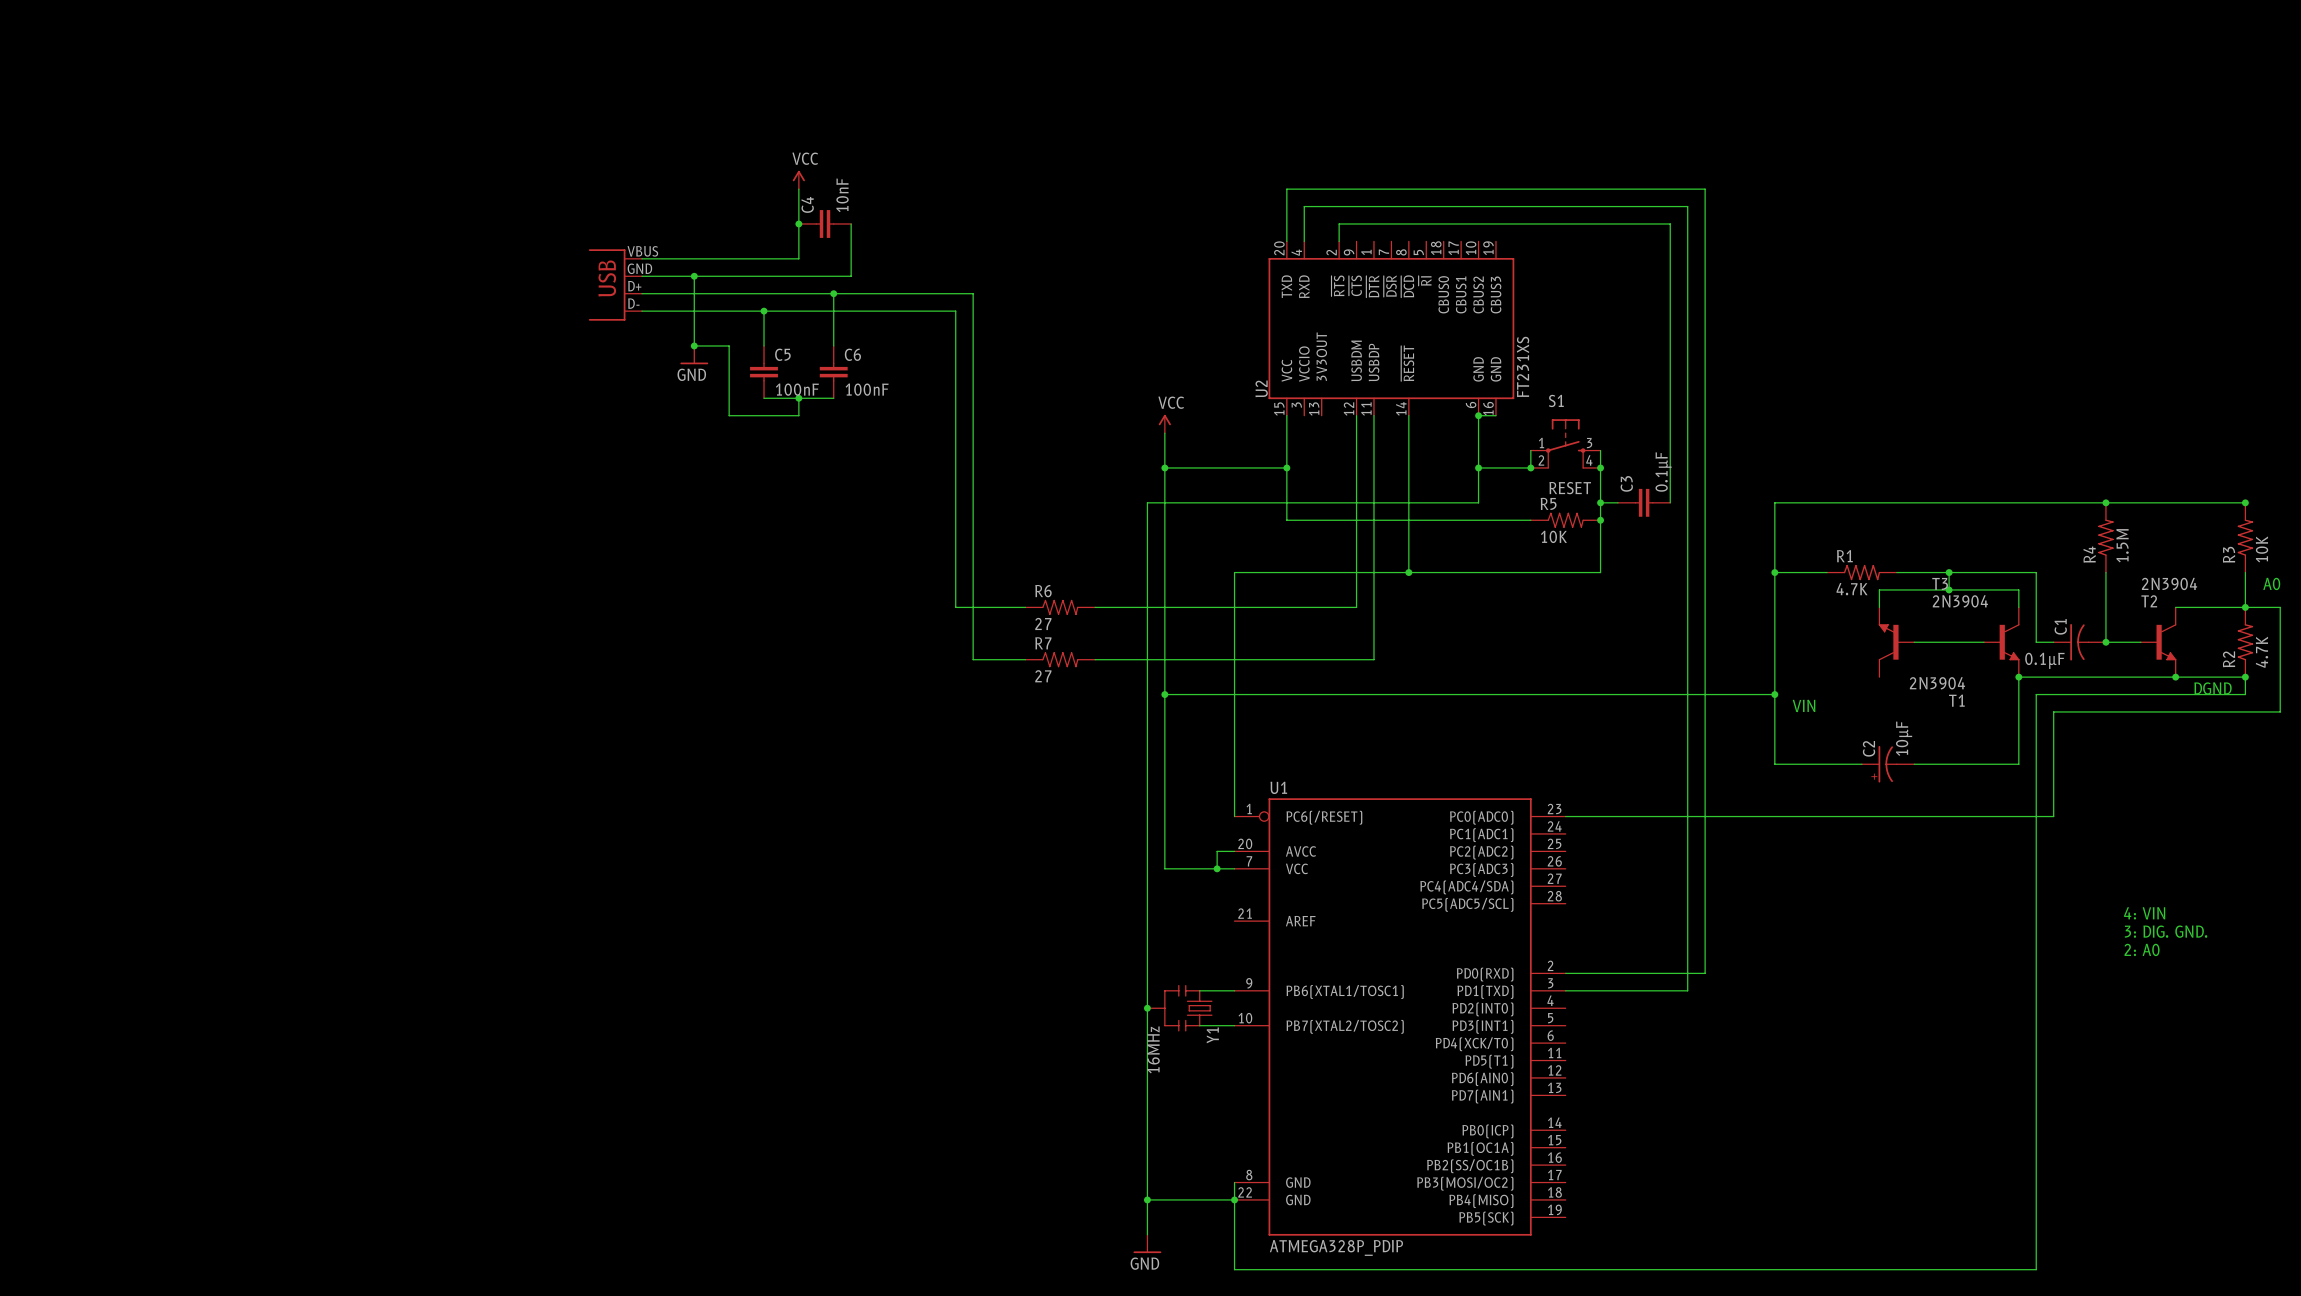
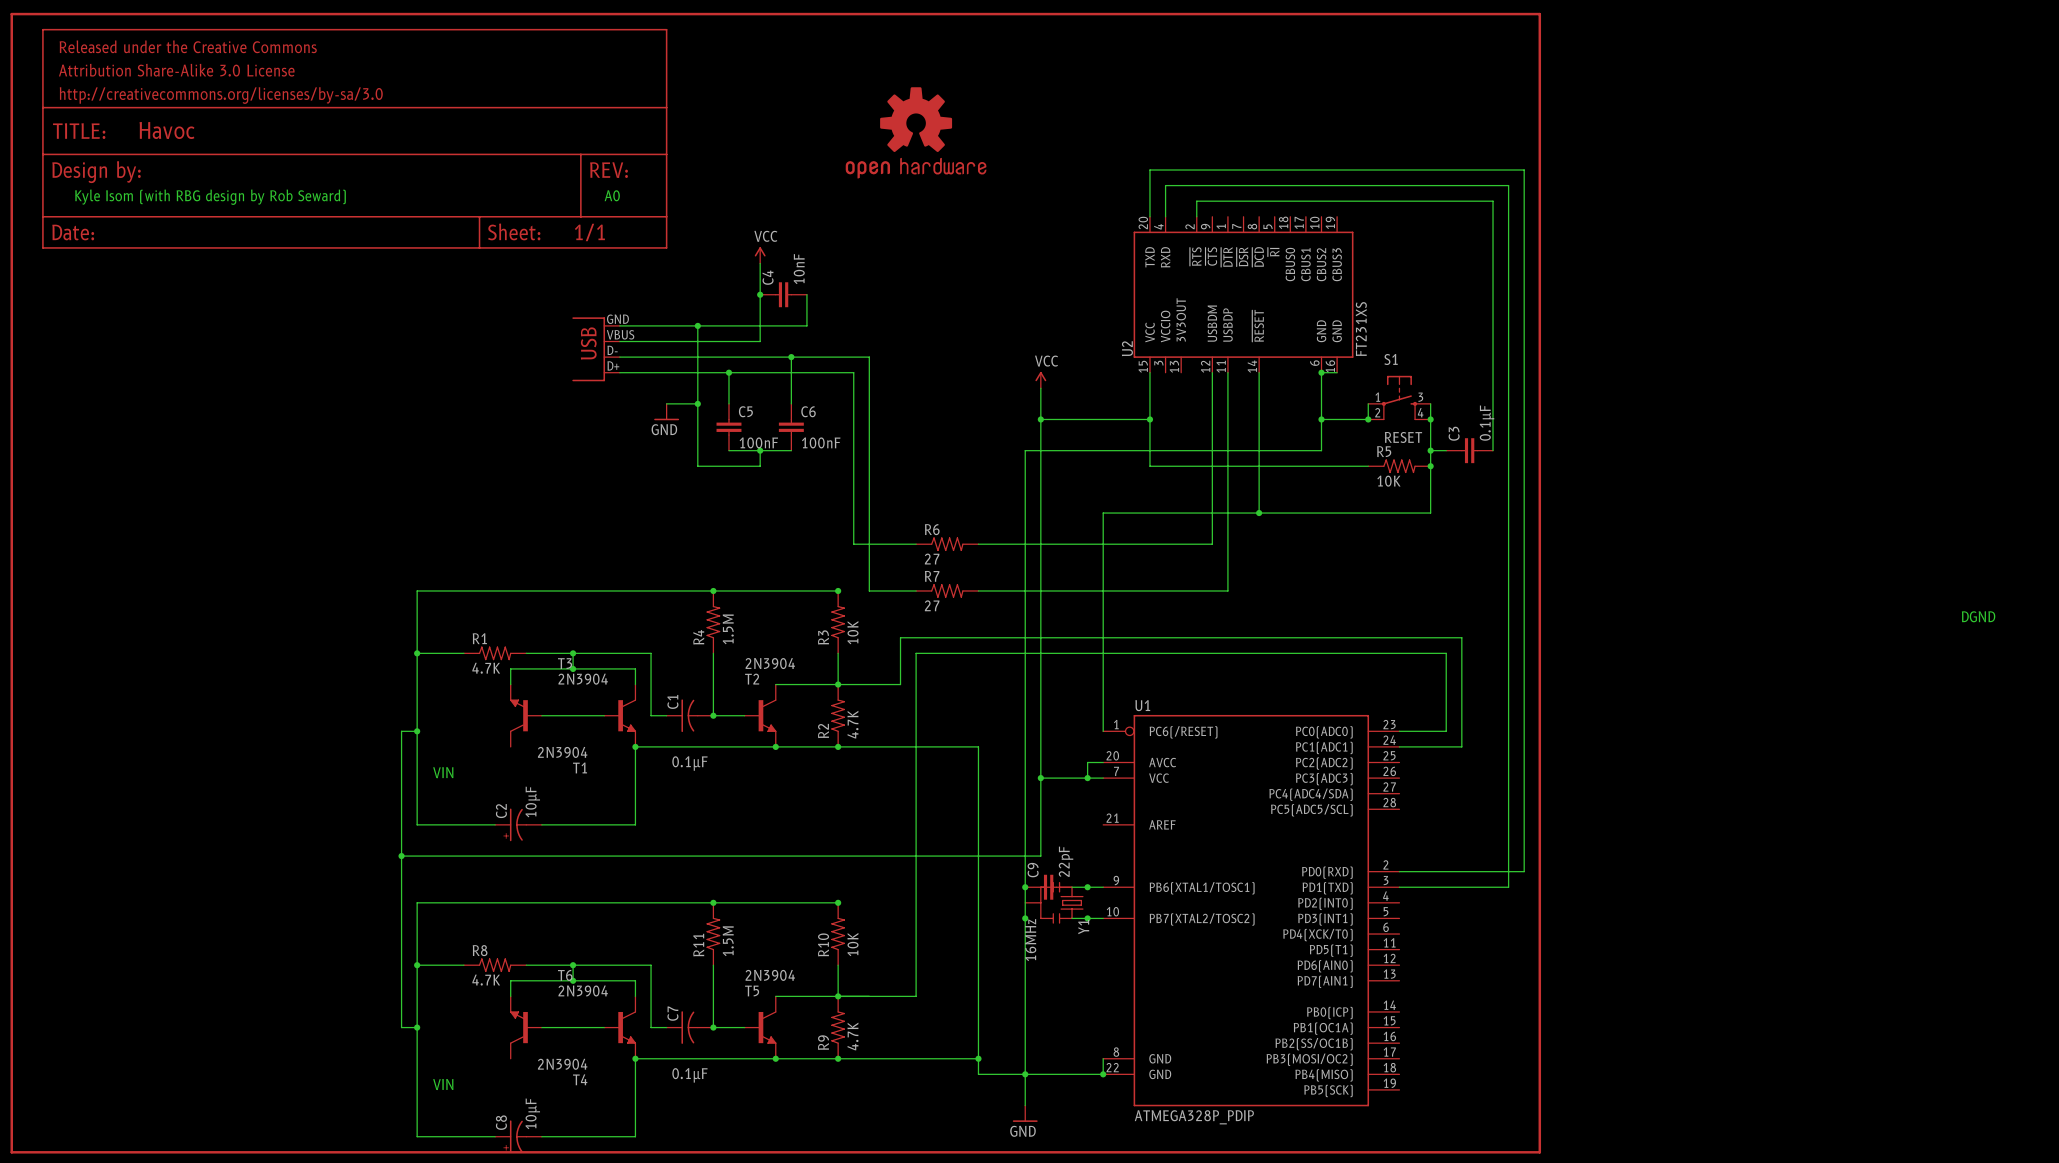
part: none -> (916, 132)
part: none -> (354, 138)
power symbol position: VCC (798, 179) -> VCC (760, 255)
wire: (798, 189) (798, 258) (642, 258) -> none
text: none -> A0 (612, 195)
text: none -> Kyle Isom (with RBG design by Rob Seward) (210, 197)
junction: (798, 223) -> none
C4 position: (825, 223) -> (783, 294)
wire: (851, 223) (851, 276) (642, 276) -> none
wire: (694, 276) (694, 345) (729, 345) (729, 415) -> (619, 372) (651, 372)
junction: (694, 276) -> none
part: (615, 284) -> none
wire: (642, 293) (973, 293) (973, 398) -> (744, 357) (869, 357)
wire: (833, 293) (833, 345) -> (791, 357) (791, 403)
junction position: (833, 293) -> (760, 294)
wire: none -> (760, 263) (760, 341) (619, 341)
wire: (642, 311) (955, 311) (955, 415) -> none
wire: (764, 311) (764, 345) -> (728, 372) (728, 403)
junction: (764, 311) -> none
wire: none -> (806, 294) (806, 325) (619, 325)
junction: (694, 345) -> none
power symbol position: GND (694, 355) -> GND (666, 412)
wire: none -> (697, 325) (697, 466) (760, 466) (760, 450)
junction: none -> (697, 325)
C5 position: (764, 372) -> (728, 427)
C6 position: (833, 372) -> (791, 427)
part: none -> (596, 349)
wire: none -> (619, 357) (682, 357)
wire: (798, 398) (798, 415) -> (853, 372) (713, 372)
junction: (798, 398) -> none
junction: none -> (791, 357)
junction: none -> (728, 372)
wire: none -> (666, 403) (697, 403)
junction: none -> (697, 403)
wire: none -> (728, 450) (791, 450)
junction: none -> (760, 450)
junction: (2105, 502) -> none
wire: (2245, 502) (1774, 502) (1774, 764) (1861, 764) -> none
junction: (2245, 502) -> none
R4 position: (2105, 537) -> (713, 622)
R3 position: (2245, 537) -> (838, 622)
wire: (1774, 572) (1827, 572) -> none
junction: (1774, 572) -> none
R1 position: (1861, 572) -> (495, 653)
wire: (1896, 572) (2036, 572) (2036, 642) (2053, 642) -> none
wire: (1949, 572) (1949, 589) -> none
junction: (1949, 572) -> none
wire: (2105, 572) (2105, 642) (2140, 642) -> none
wire: (2245, 572) (2245, 607) -> none
text: A0 (2271, 583) -> none
junction: (1949, 589) -> none
wire: (1879, 607) (1879, 589) (2018, 589) (2018, 607) -> none
wire: (2175, 607) (2280, 607) (2280, 711) (2053, 711) (2053, 816) (1617, 816) -> (775, 996) (916, 996) (916, 653) (1446, 653) (1446, 731)
junction: (2245, 607) -> none
T1 position: (1896, 642) -> (526, 715)
wire: (1914, 642) (1983, 642) -> none
T3 position: (2001, 642) -> (620, 715)
C1 position: (2079, 642) -> (690, 715)
junction: (2105, 642) -> none
T2 position: (2158, 642) -> (760, 715)
R2 position: (2245, 642) -> (838, 715)
part: none -> (775, 583)
junction: none -> (713, 590)
wire: none -> (838, 590) (417, 590) (417, 824) (495, 824)
junction: none -> (838, 590)
C1 value position: 0.1µF (2044, 660) -> 0.1µF (689, 763)
junction: (2018, 677) -> none
junction: (2175, 677) -> none
junction: (2245, 677) -> none
wire: (1164, 694) (1774, 694) -> none
junction: (1164, 694) -> none
junction: (1774, 694) -> none
text: VIN (1804, 705) -> none
wire: none -> (417, 653) (463, 653)
junction: none -> (417, 653)
wire: none -> (526, 653) (651, 653) (651, 715) (666, 715)
wire: none -> (573, 653) (573, 668)
junction: none -> (573, 653)
wire: none -> (713, 653) (713, 715) (744, 715)
wire: none -> (838, 653) (838, 684)
junction: none -> (573, 668)
wire: none -> (510, 684) (510, 668) (635, 668) (635, 684)
wire: none -> (775, 684) (900, 684) (900, 637) (1461, 637) (1461, 746) (1399, 746)
junction: none -> (838, 684)
C2 position: (1888, 764) -> (518, 824)
wire: (1914, 764) (2018, 764) (2018, 677) (2245, 677) (2245, 694) (2036, 694) (2036, 1269) (1234, 1269) (1234, 1199) -> none
wire: none -> (541, 715) (604, 715)
junction: none -> (713, 715)
wire: none -> (417, 731) (401, 731) (401, 1027) (417, 1027)
junction: none -> (417, 731)
junction: none -> (635, 746)
junction: none -> (775, 746)
junction: none -> (838, 746)
text: none -> VIN (443, 772)
wire: none -> (1040, 778) (1040, 856) (401, 856)
junction: none -> (1040, 778)
text: 4: VIN (2144, 913) -> none
wire: none -> (541, 824) (635, 824) (635, 746) (978, 746) (978, 1074) (1025, 1074)
text: 3: DIG. GND. (2166, 931) -> none
text: 2: A0 (2142, 949) -> none
junction: none -> (401, 856)
junction: none -> (1025, 887)
C9: none -> 22pF (1048, 887)
junction: none -> (1087, 887)
junction: none -> (713, 902)
wire: none -> (838, 902) (417, 902) (417, 1136) (495, 1136)
junction: none -> (838, 902)
junction: (1147, 1008) -> none
junction: none -> (1025, 918)
junction: none -> (1087, 918)
R11: none -> 1.5M (713, 934)
R10: none -> 10K (838, 934)
wire: none -> (417, 965) (463, 965)
junction: none -> (417, 965)
R8: none -> 4.7K (495, 965)
wire: none -> (526, 965) (651, 965) (651, 1027) (666, 1027)
wire: none -> (573, 965) (573, 980)
junction: none -> (573, 965)
wire: none -> (713, 965) (713, 1027) (744, 1027)
wire: none -> (838, 965) (838, 996)
junction: none -> (573, 980)
wire: none -> (510, 996) (510, 980) (635, 980) (635, 996)
junction: none -> (838, 996)
junction: none -> (417, 1027)
T4: none -> 2N3904 (526, 1027)
wire: none -> (541, 1027) (604, 1027)
T6: none -> 2N3904 (620, 1027)
C7: none -> 0.1µF (690, 1027)
junction: none -> (713, 1027)
T5: none -> 2N3904 (760, 1027)
R9: none -> 4.7K (838, 1027)
junction: none -> (635, 1058)
junction: none -> (775, 1058)
junction: none -> (838, 1058)
wire: none -> (978, 1058) (635, 1058) (635, 1136) (541, 1136)
junction: none -> (978, 1058)
text: none -> VIN (443, 1084)
C8: none -> 10µF (518, 1136)

